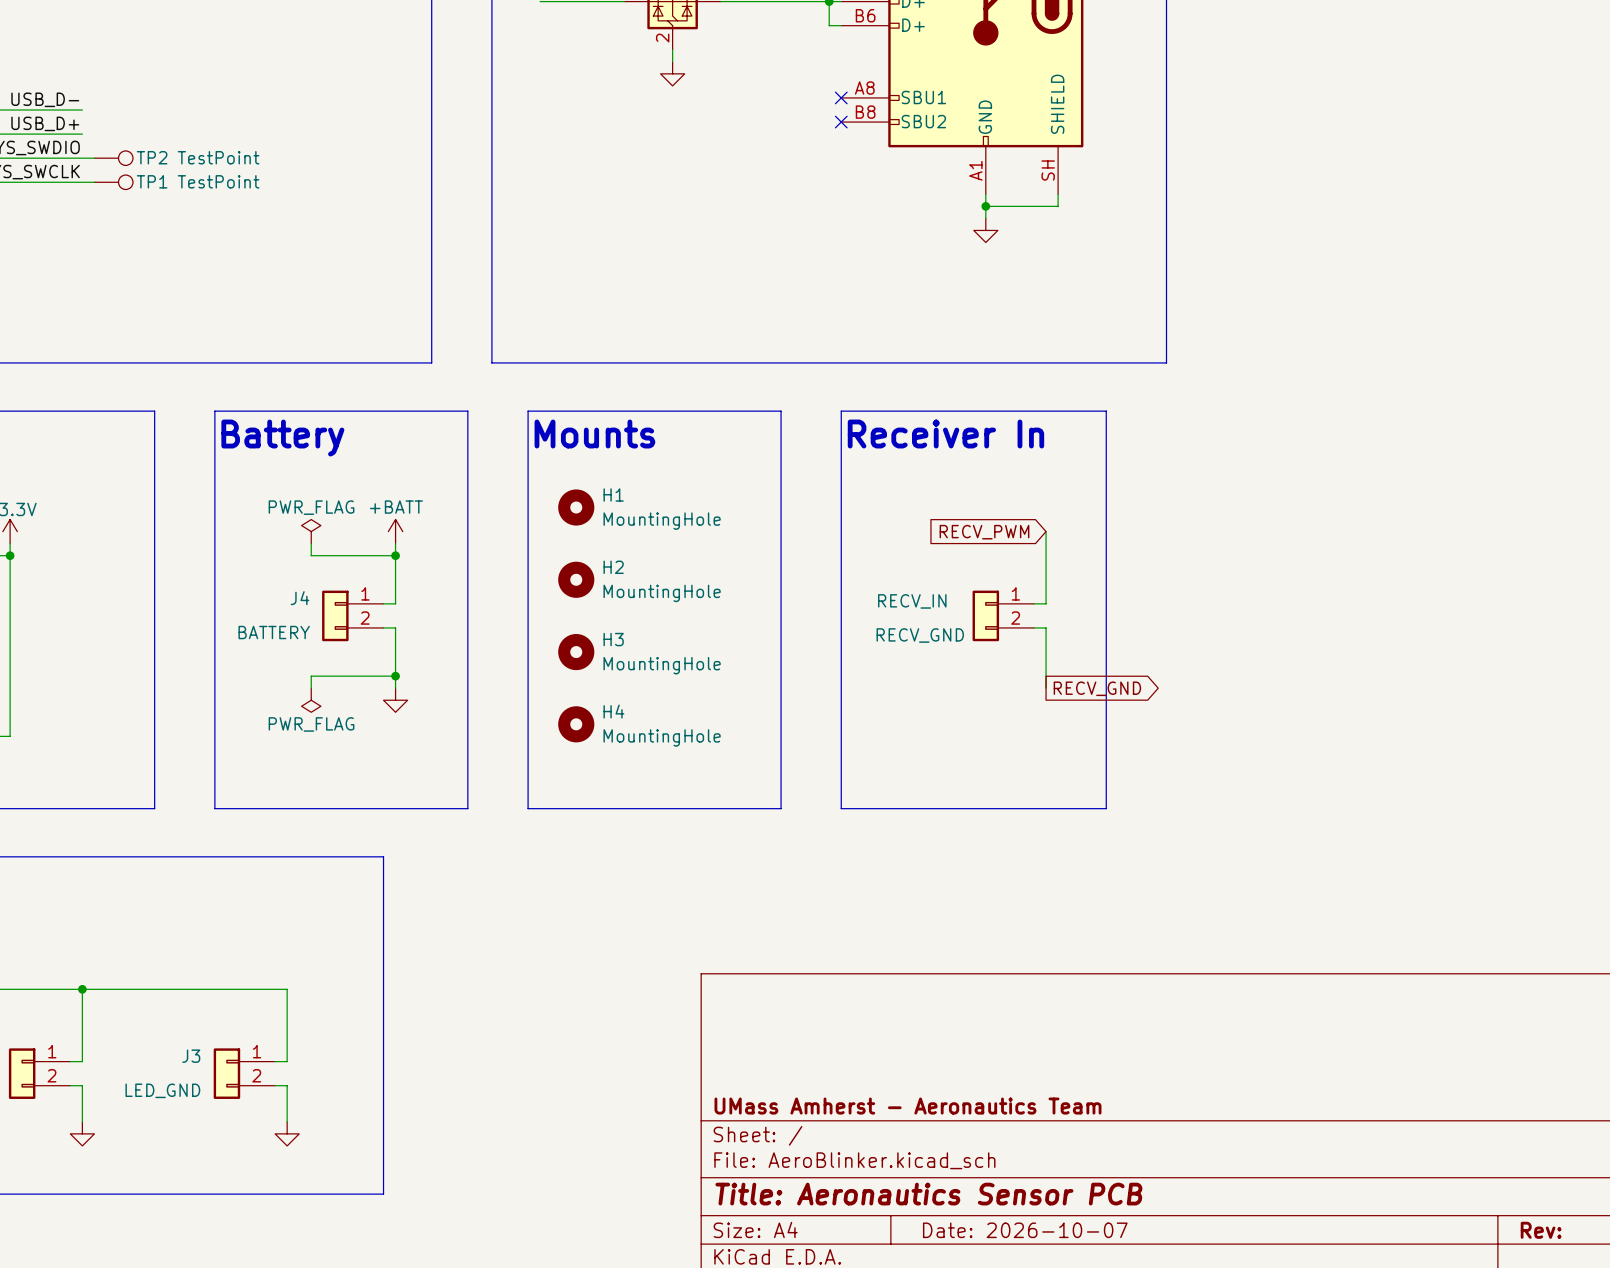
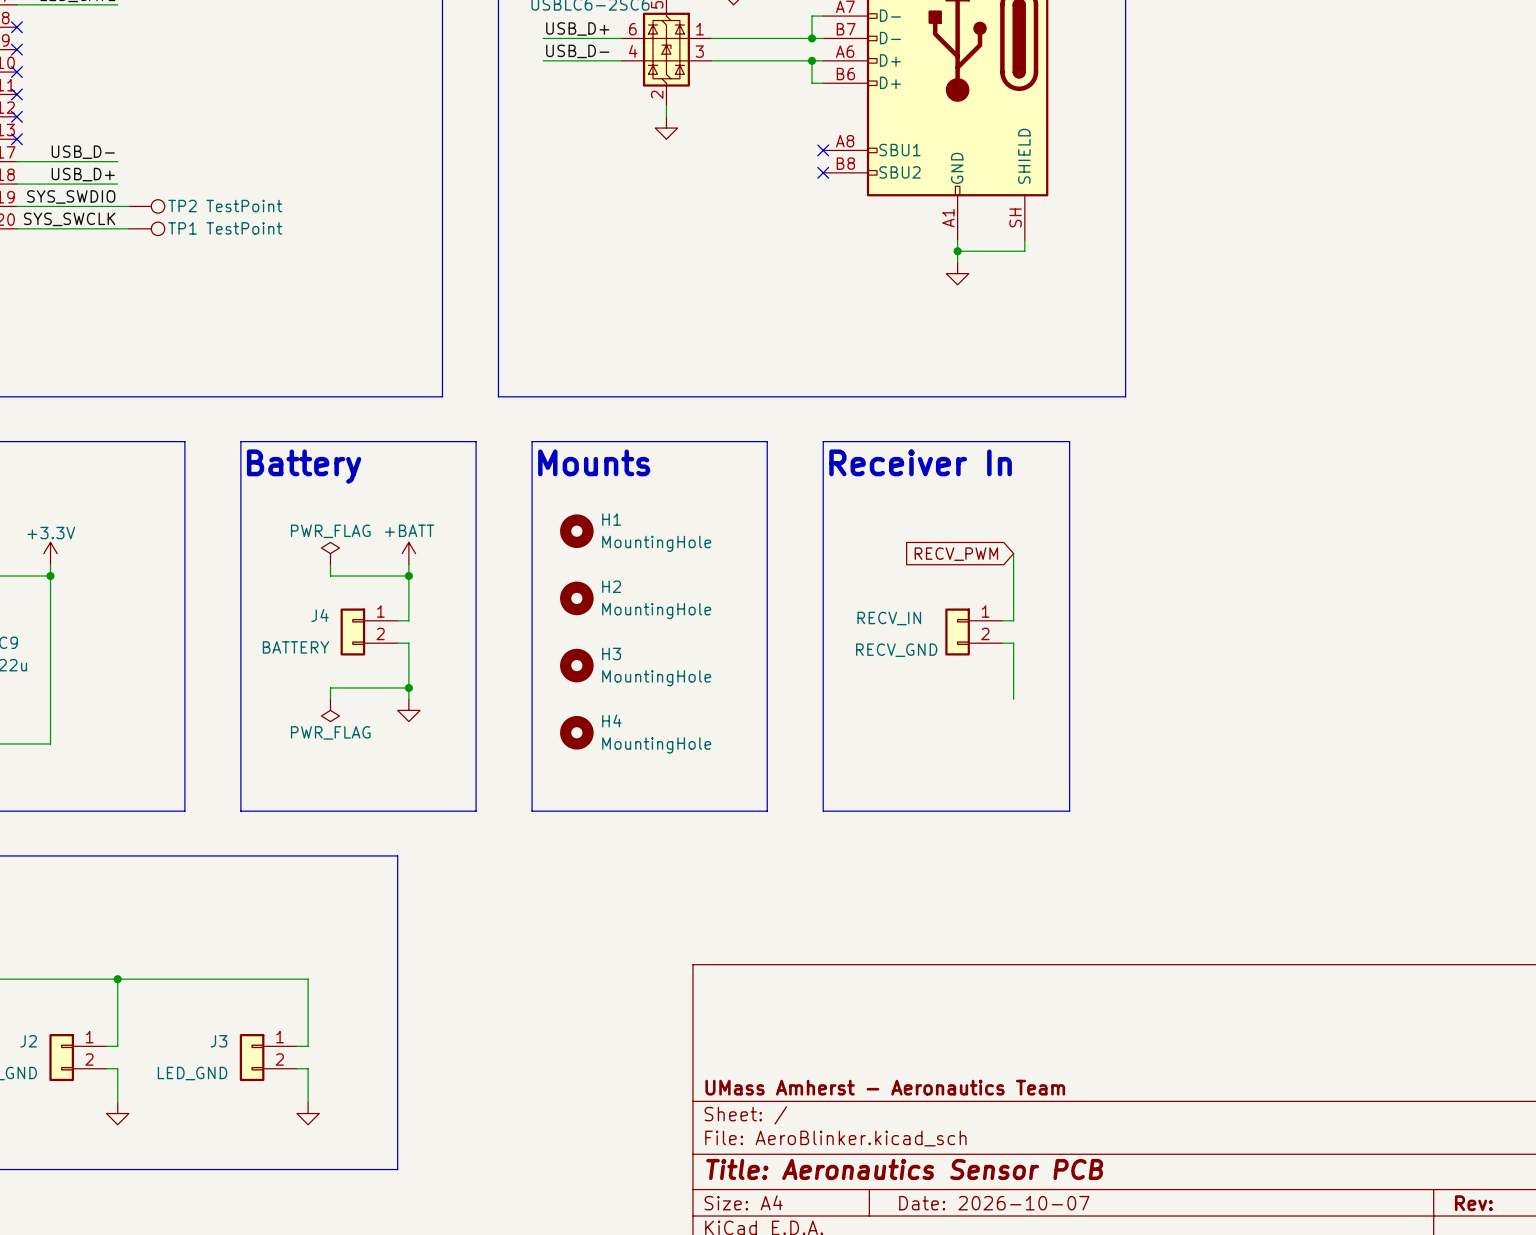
global label: RECV_GND (1097, 688) -> none

